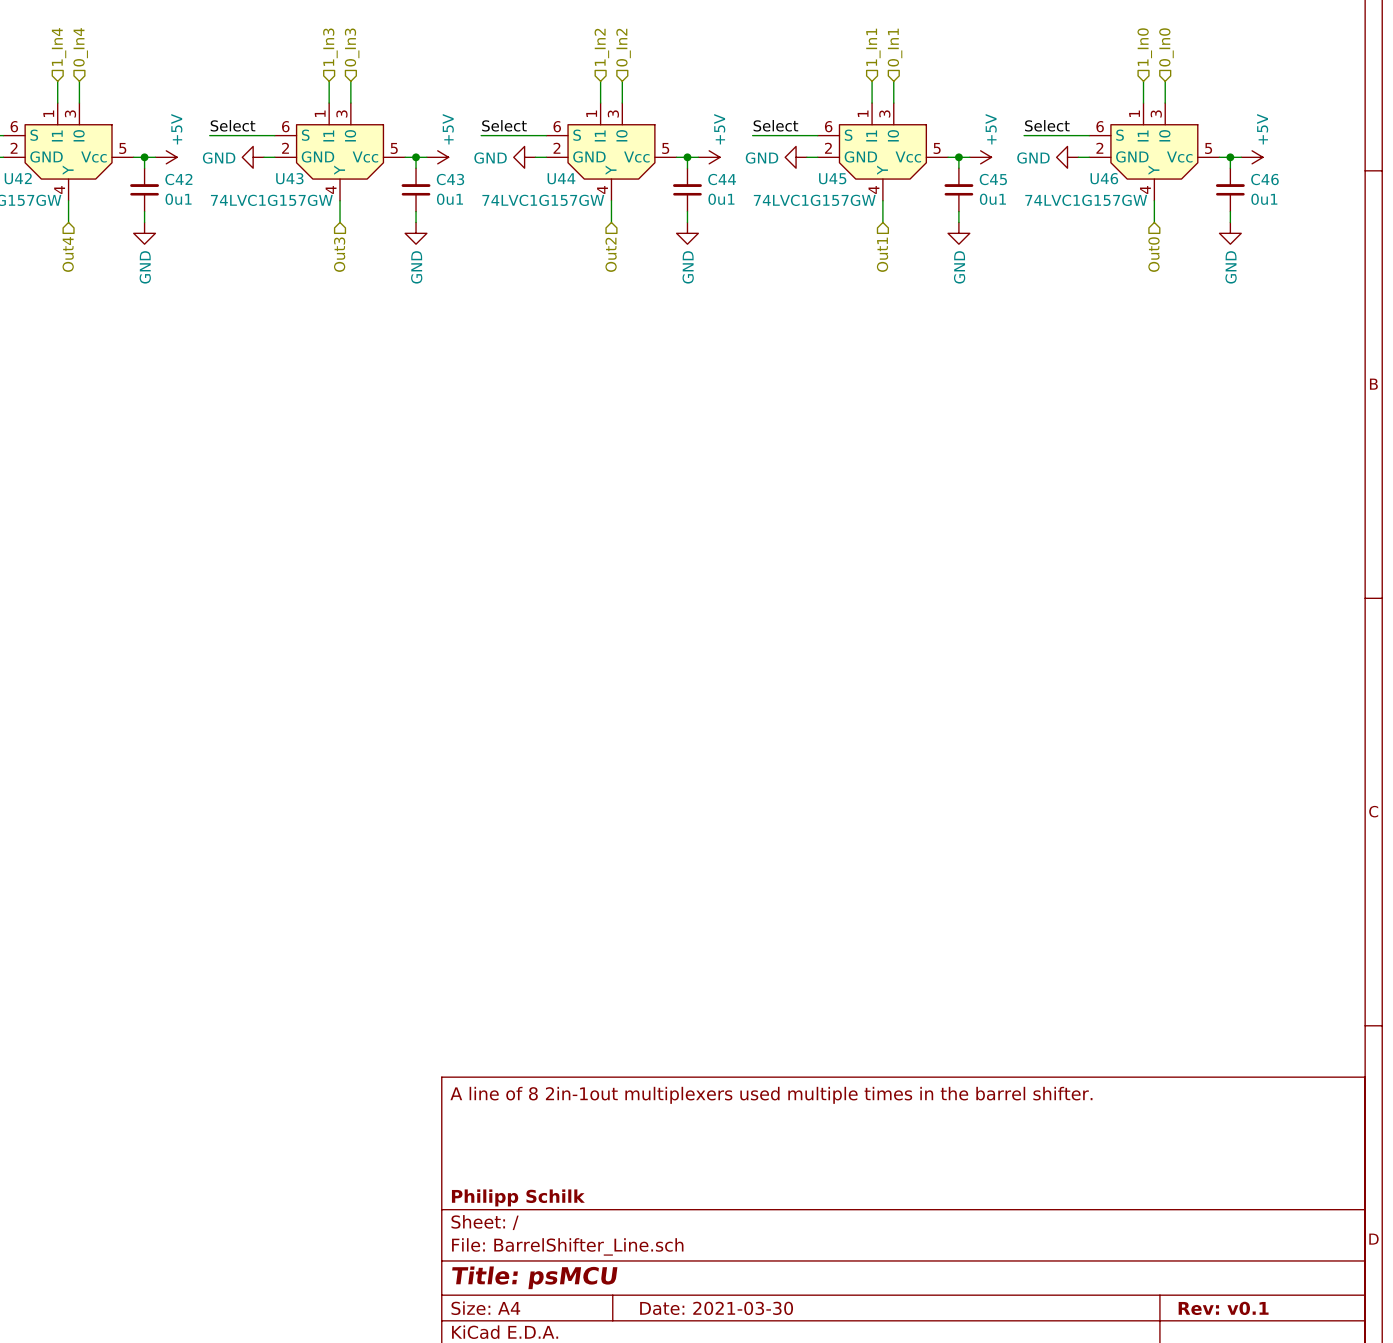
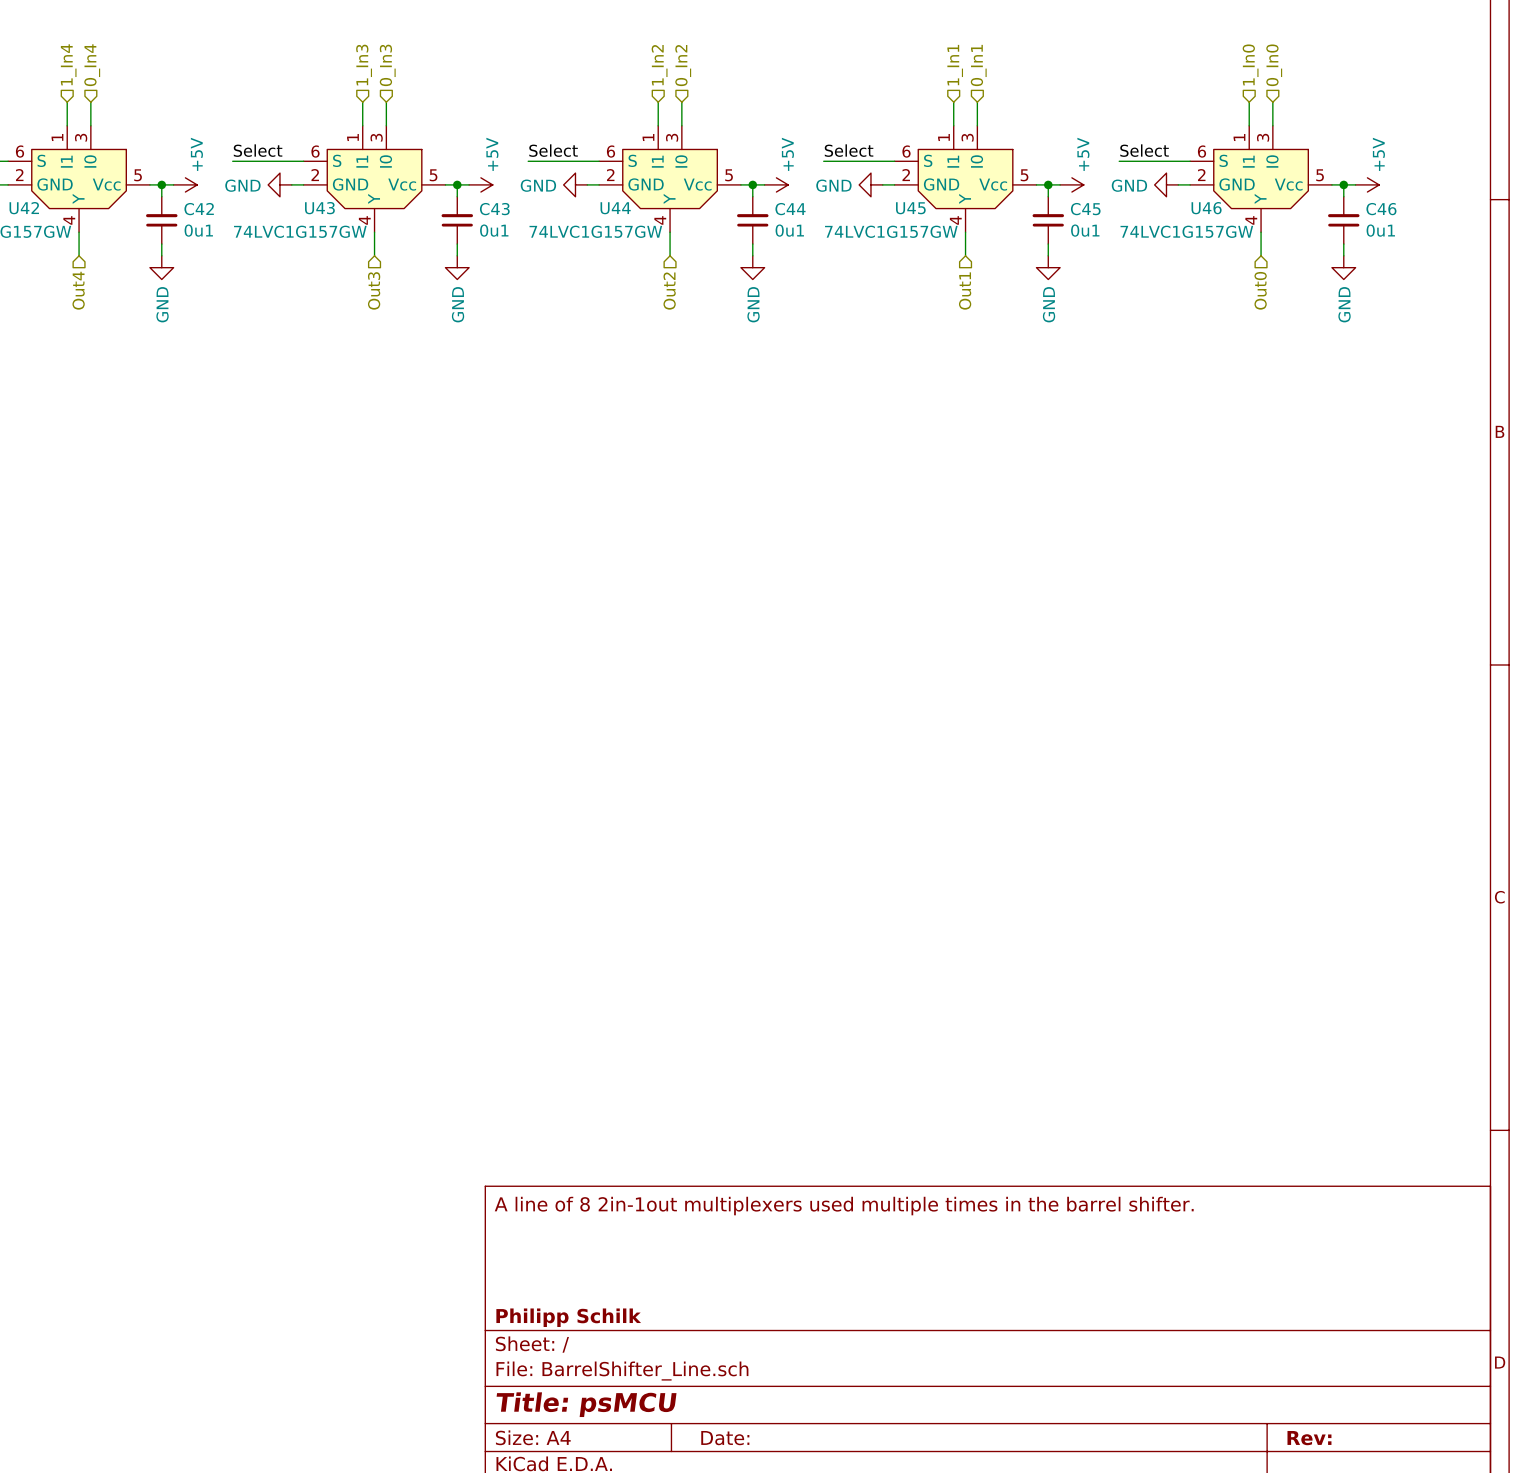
title block: Date: 2021-03-30 (716, 1308) -> Date: (725, 1438)
title block: Rev: v0.1 (1223, 1308) -> Rev: (1309, 1438)

